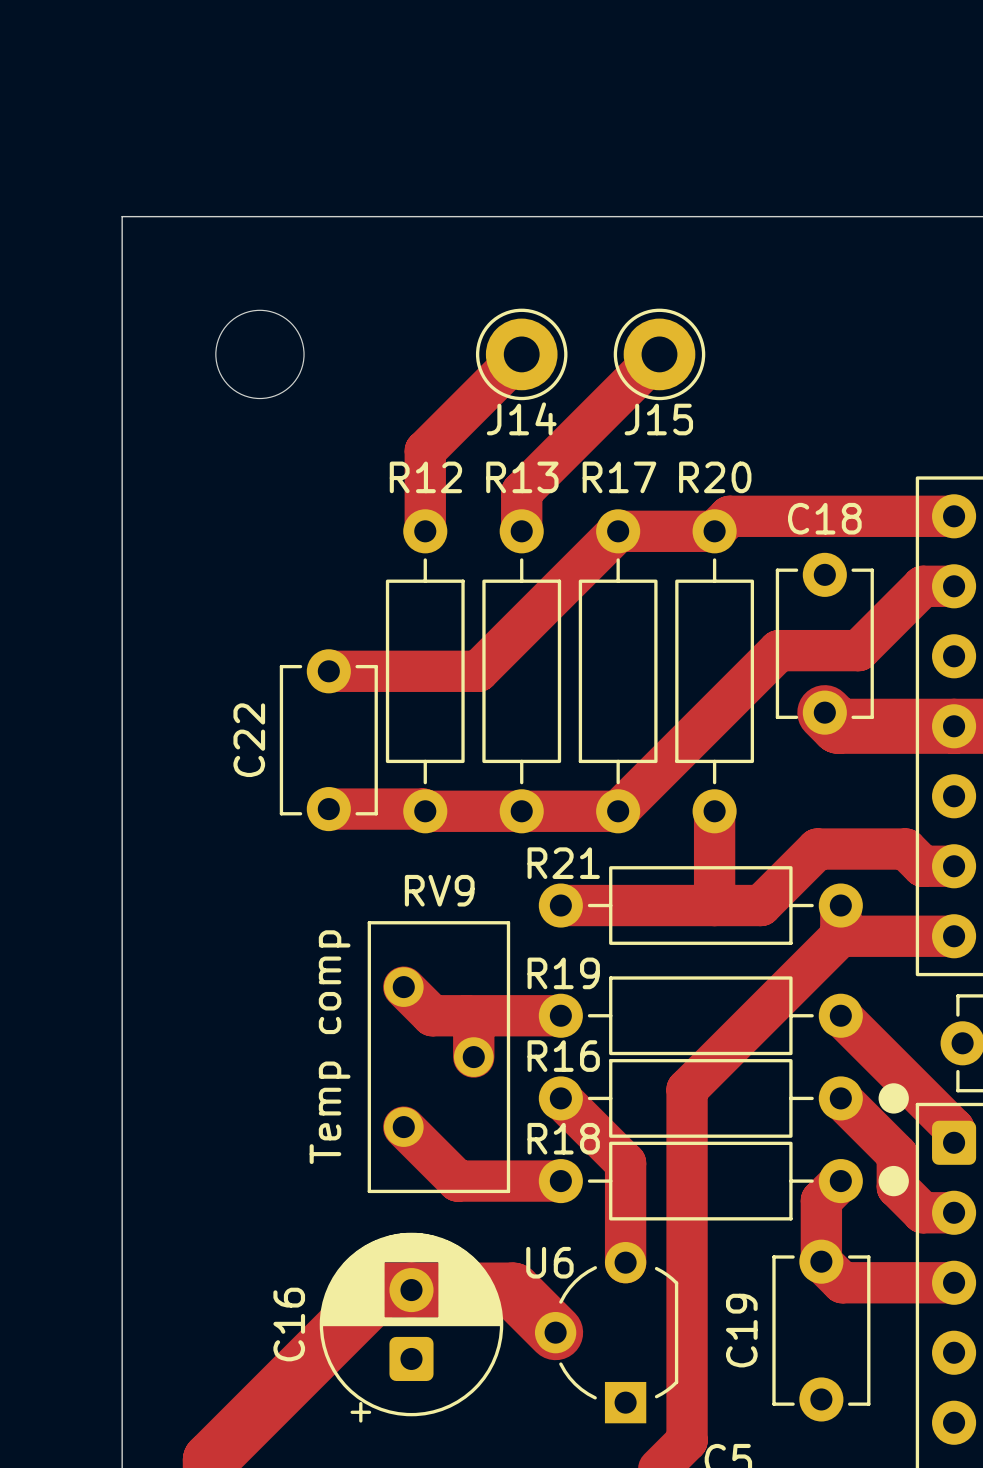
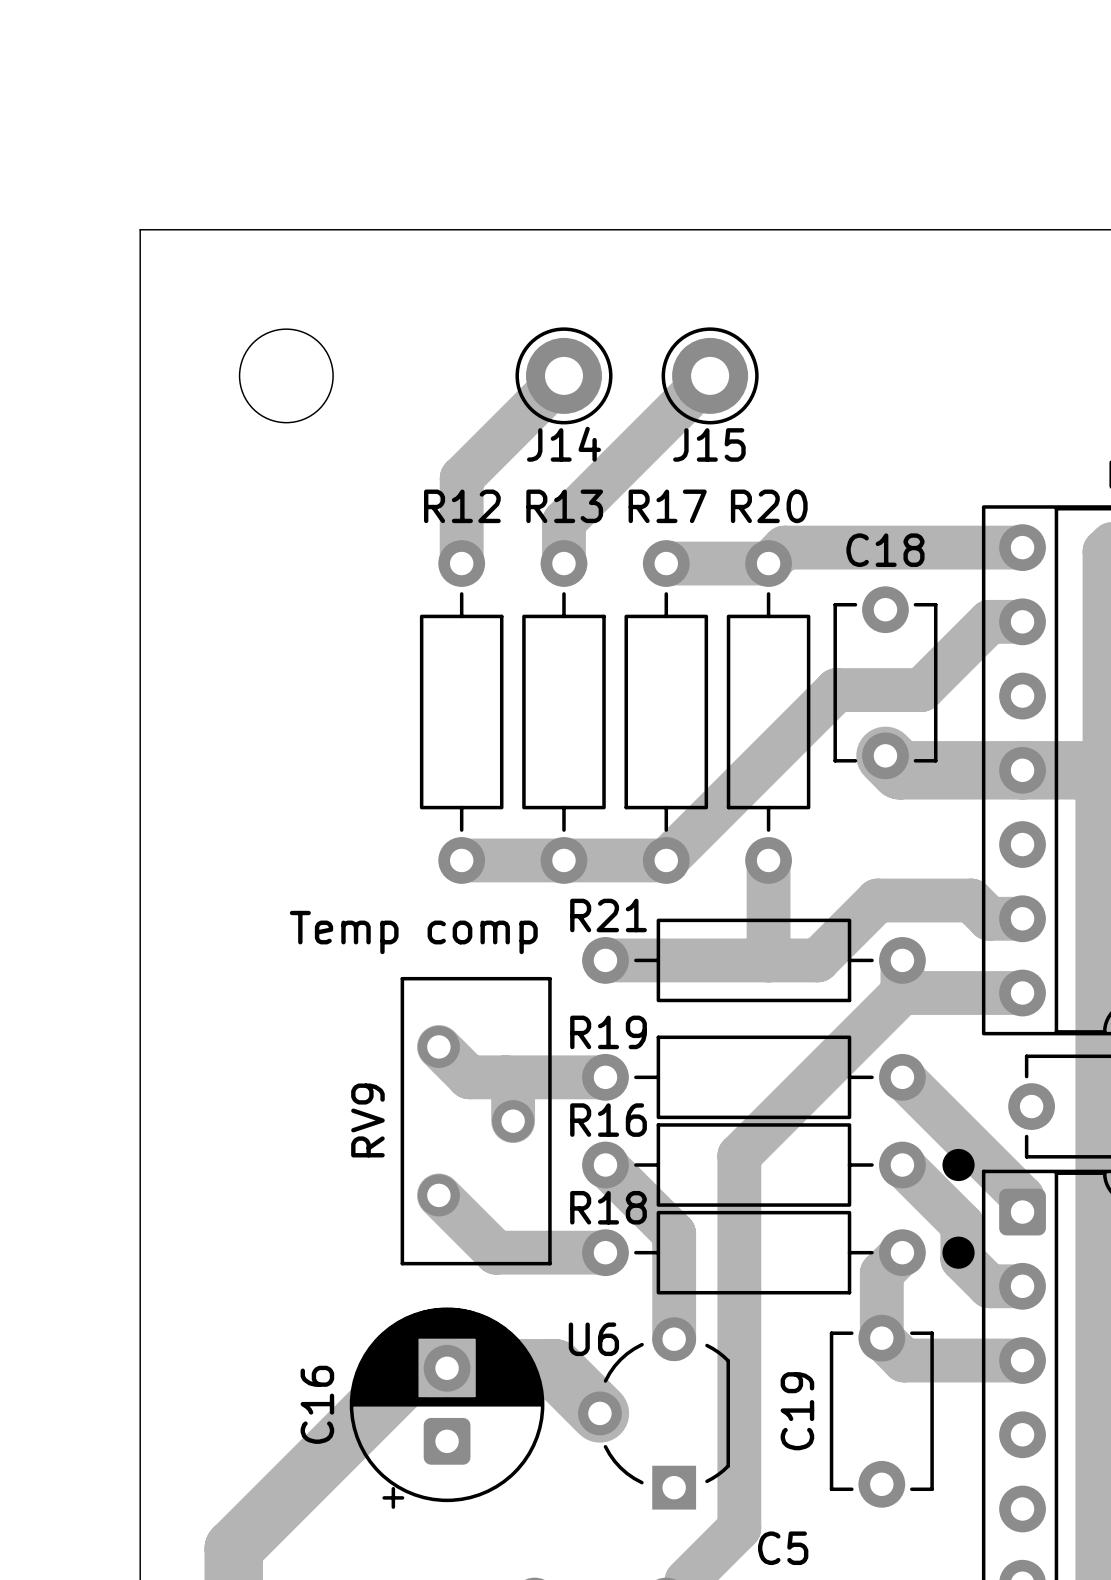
track: (618, 531) (478, 671) (328, 671) -> none
C22: (328, 740) -> none
track: (328, 809) (423, 809) (425, 811) -> none
RV9 name rotation: 0° (439, 890) -> 90° counterclockwise (367, 1120)
RV9 name position: RV9 (439, 890) -> RV9 (367, 1120)
text rotation: 0° (330, 1047) -> 90° clockwise (413, 932)

